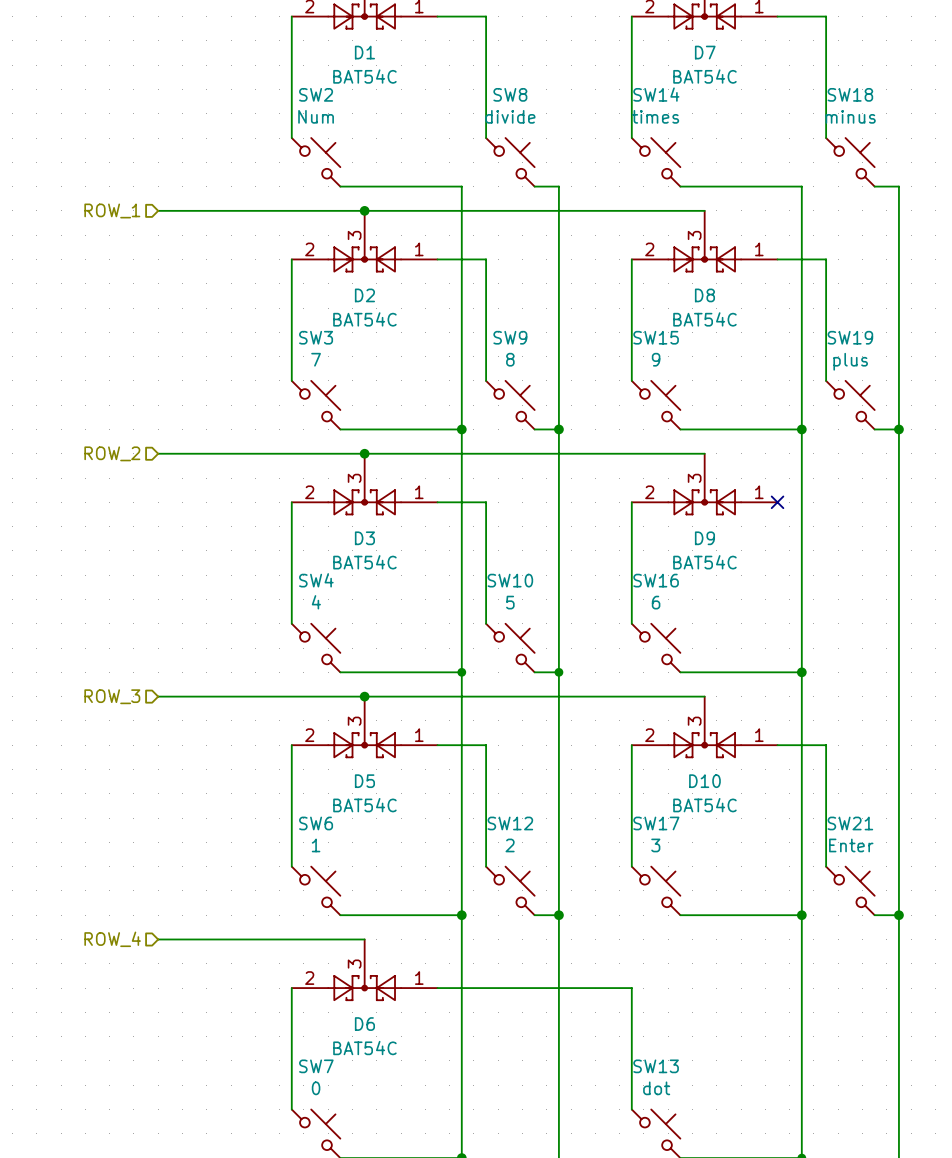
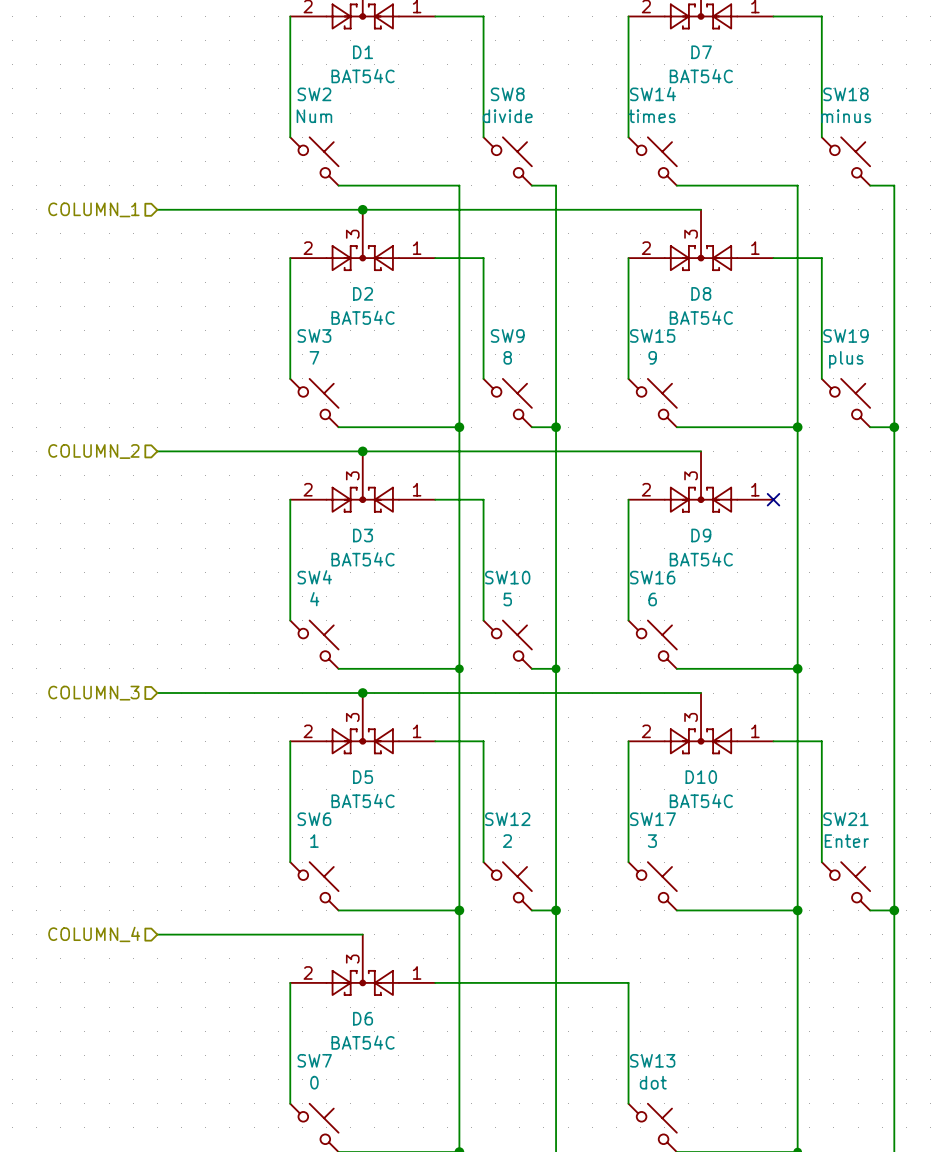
hierarchical label: ROW_1 (112, 210) -> COLUMN_1 (93, 209)
hierarchical label: ROW_2 (112, 453) -> COLUMN_2 (93, 451)
hierarchical label: ROW_3 (112, 696) -> COLUMN_3 (93, 693)
hierarchical label: ROW_4 (112, 939) -> COLUMN_4 (94, 934)

